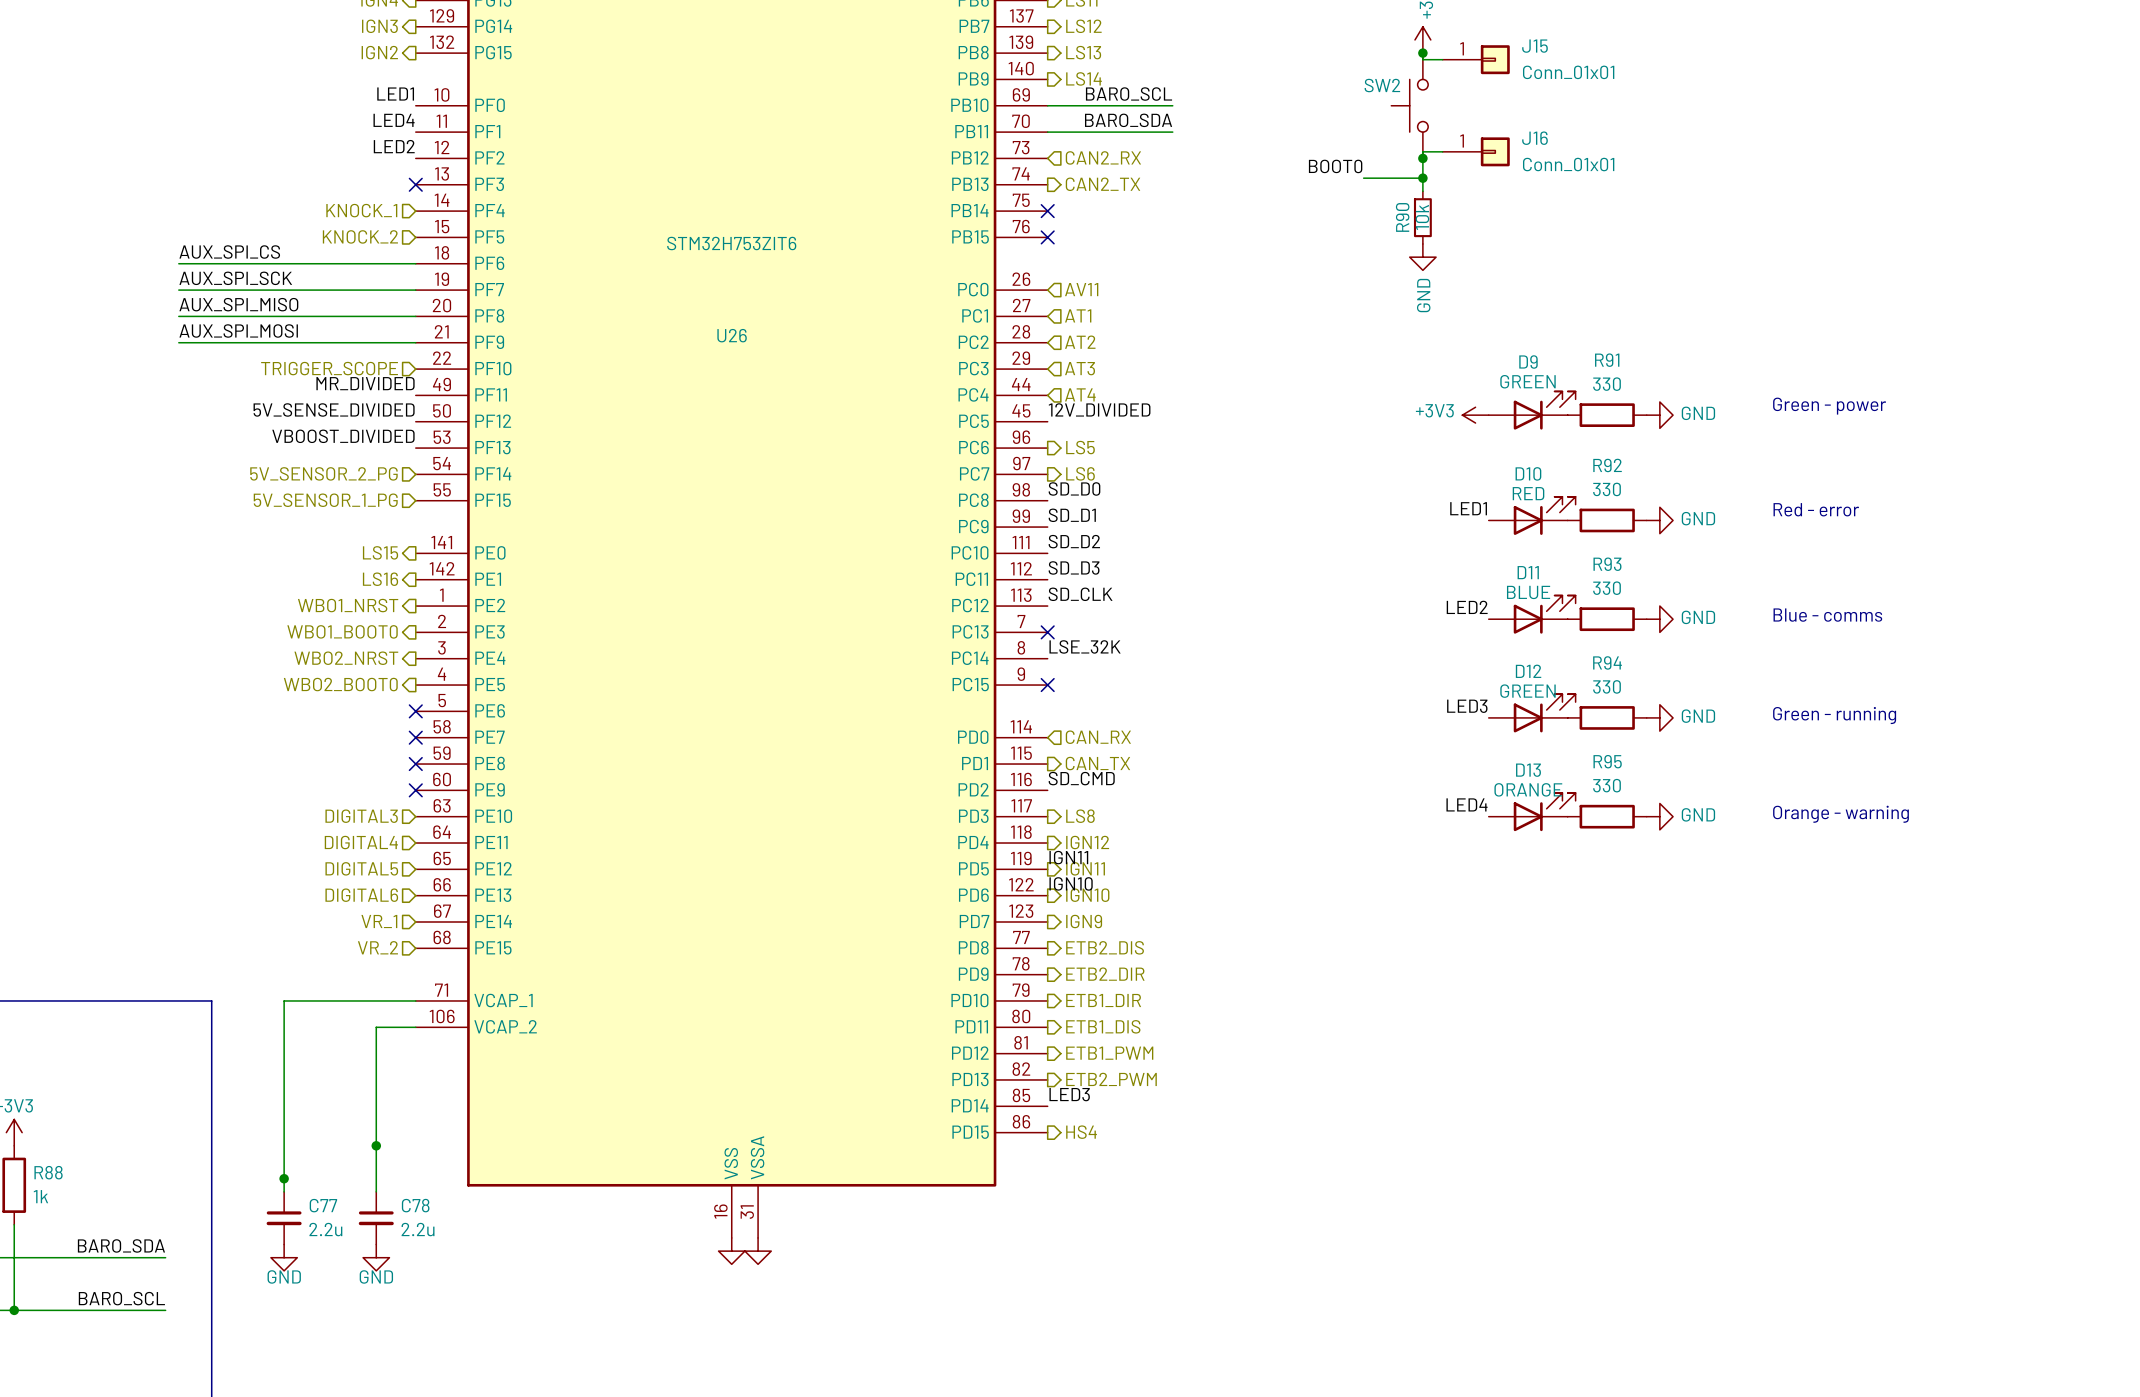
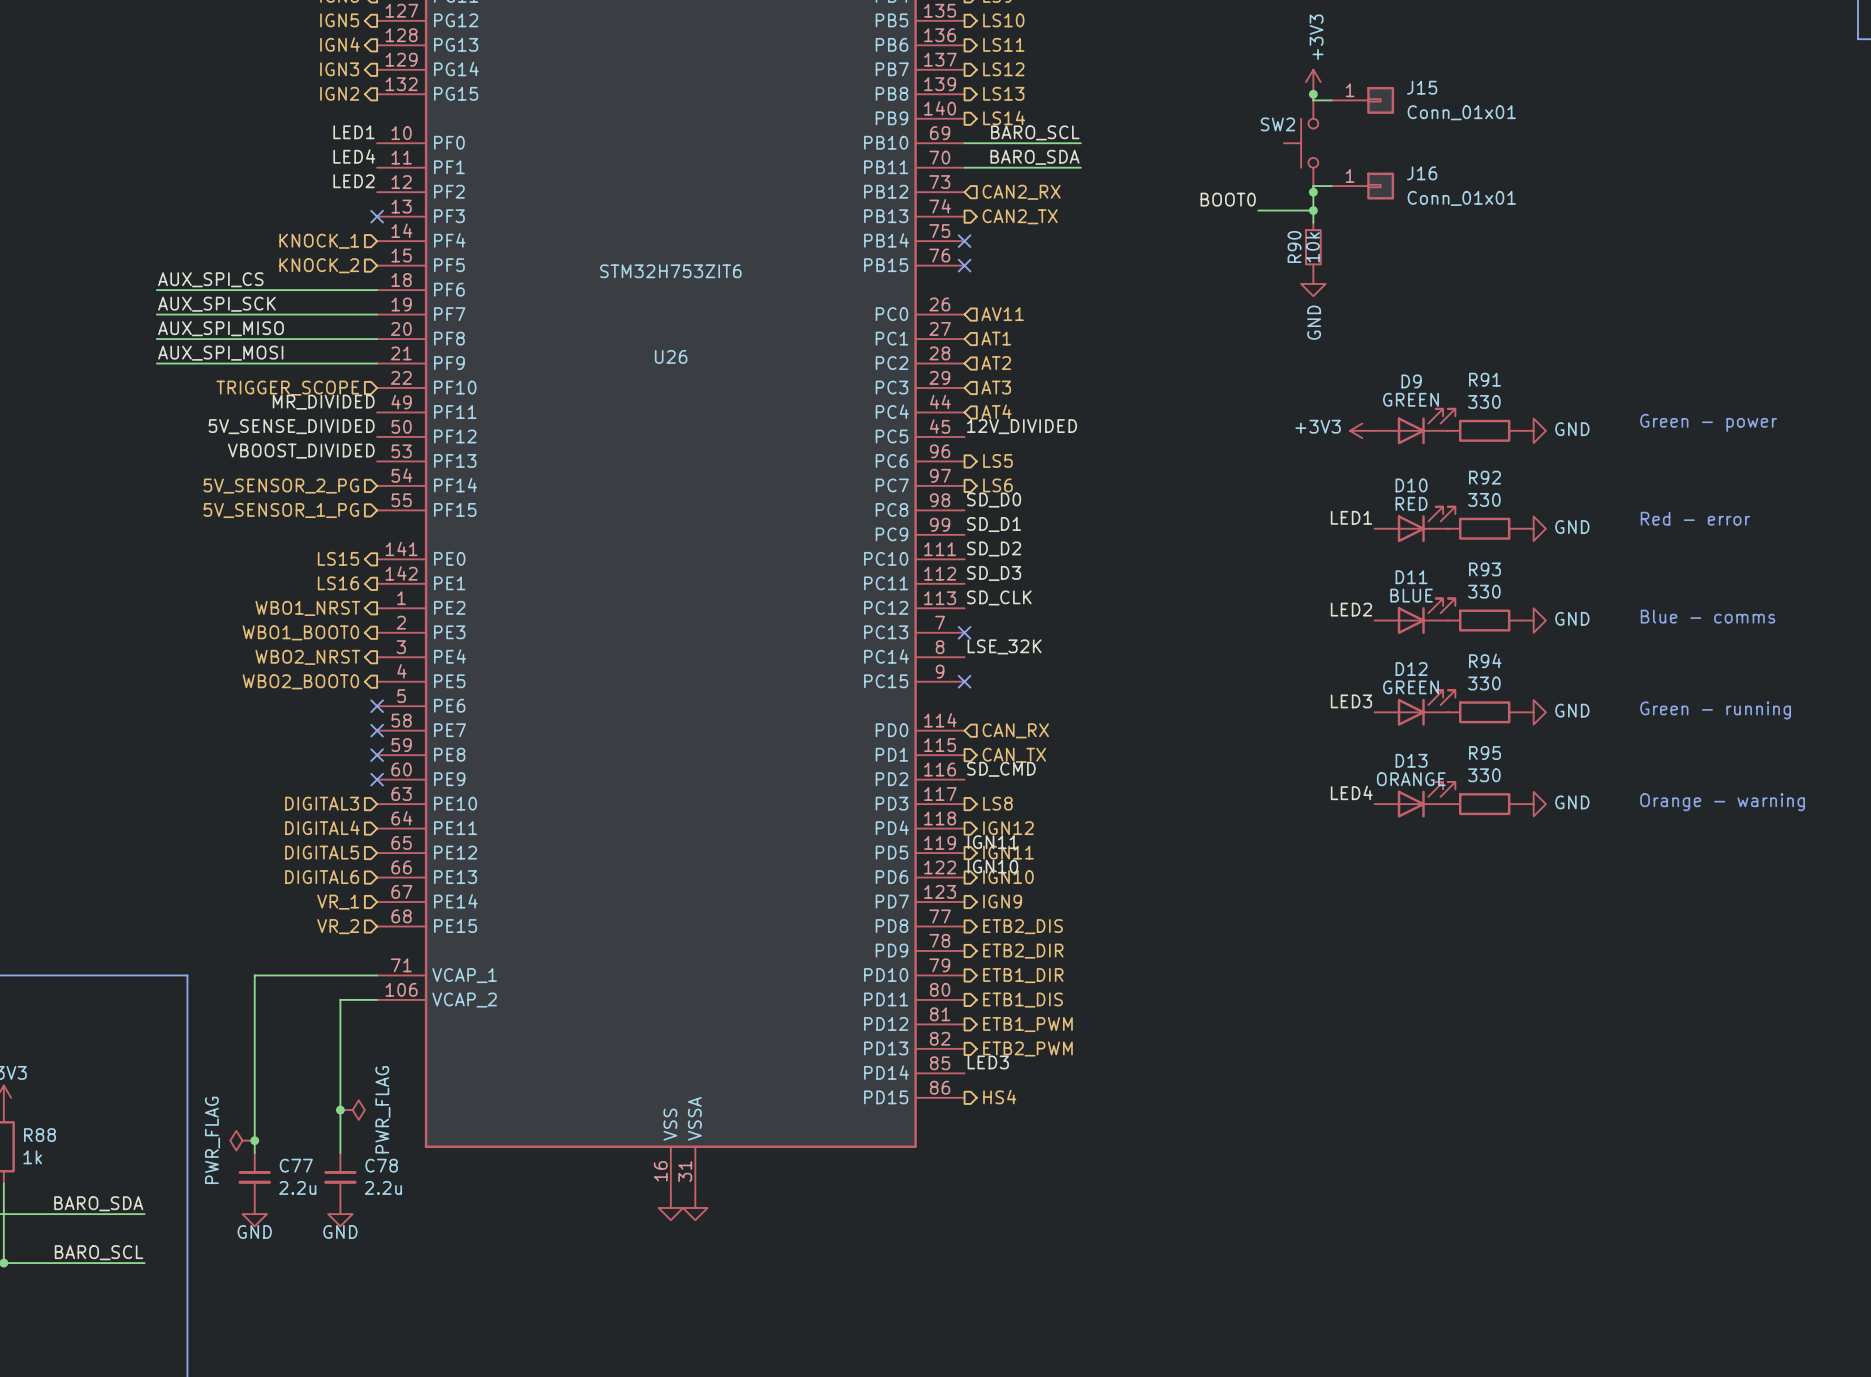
power symbol: none -> PWR_FLAG (352, 1110)
power symbol: none -> PWR_FLAG (242, 1140)

